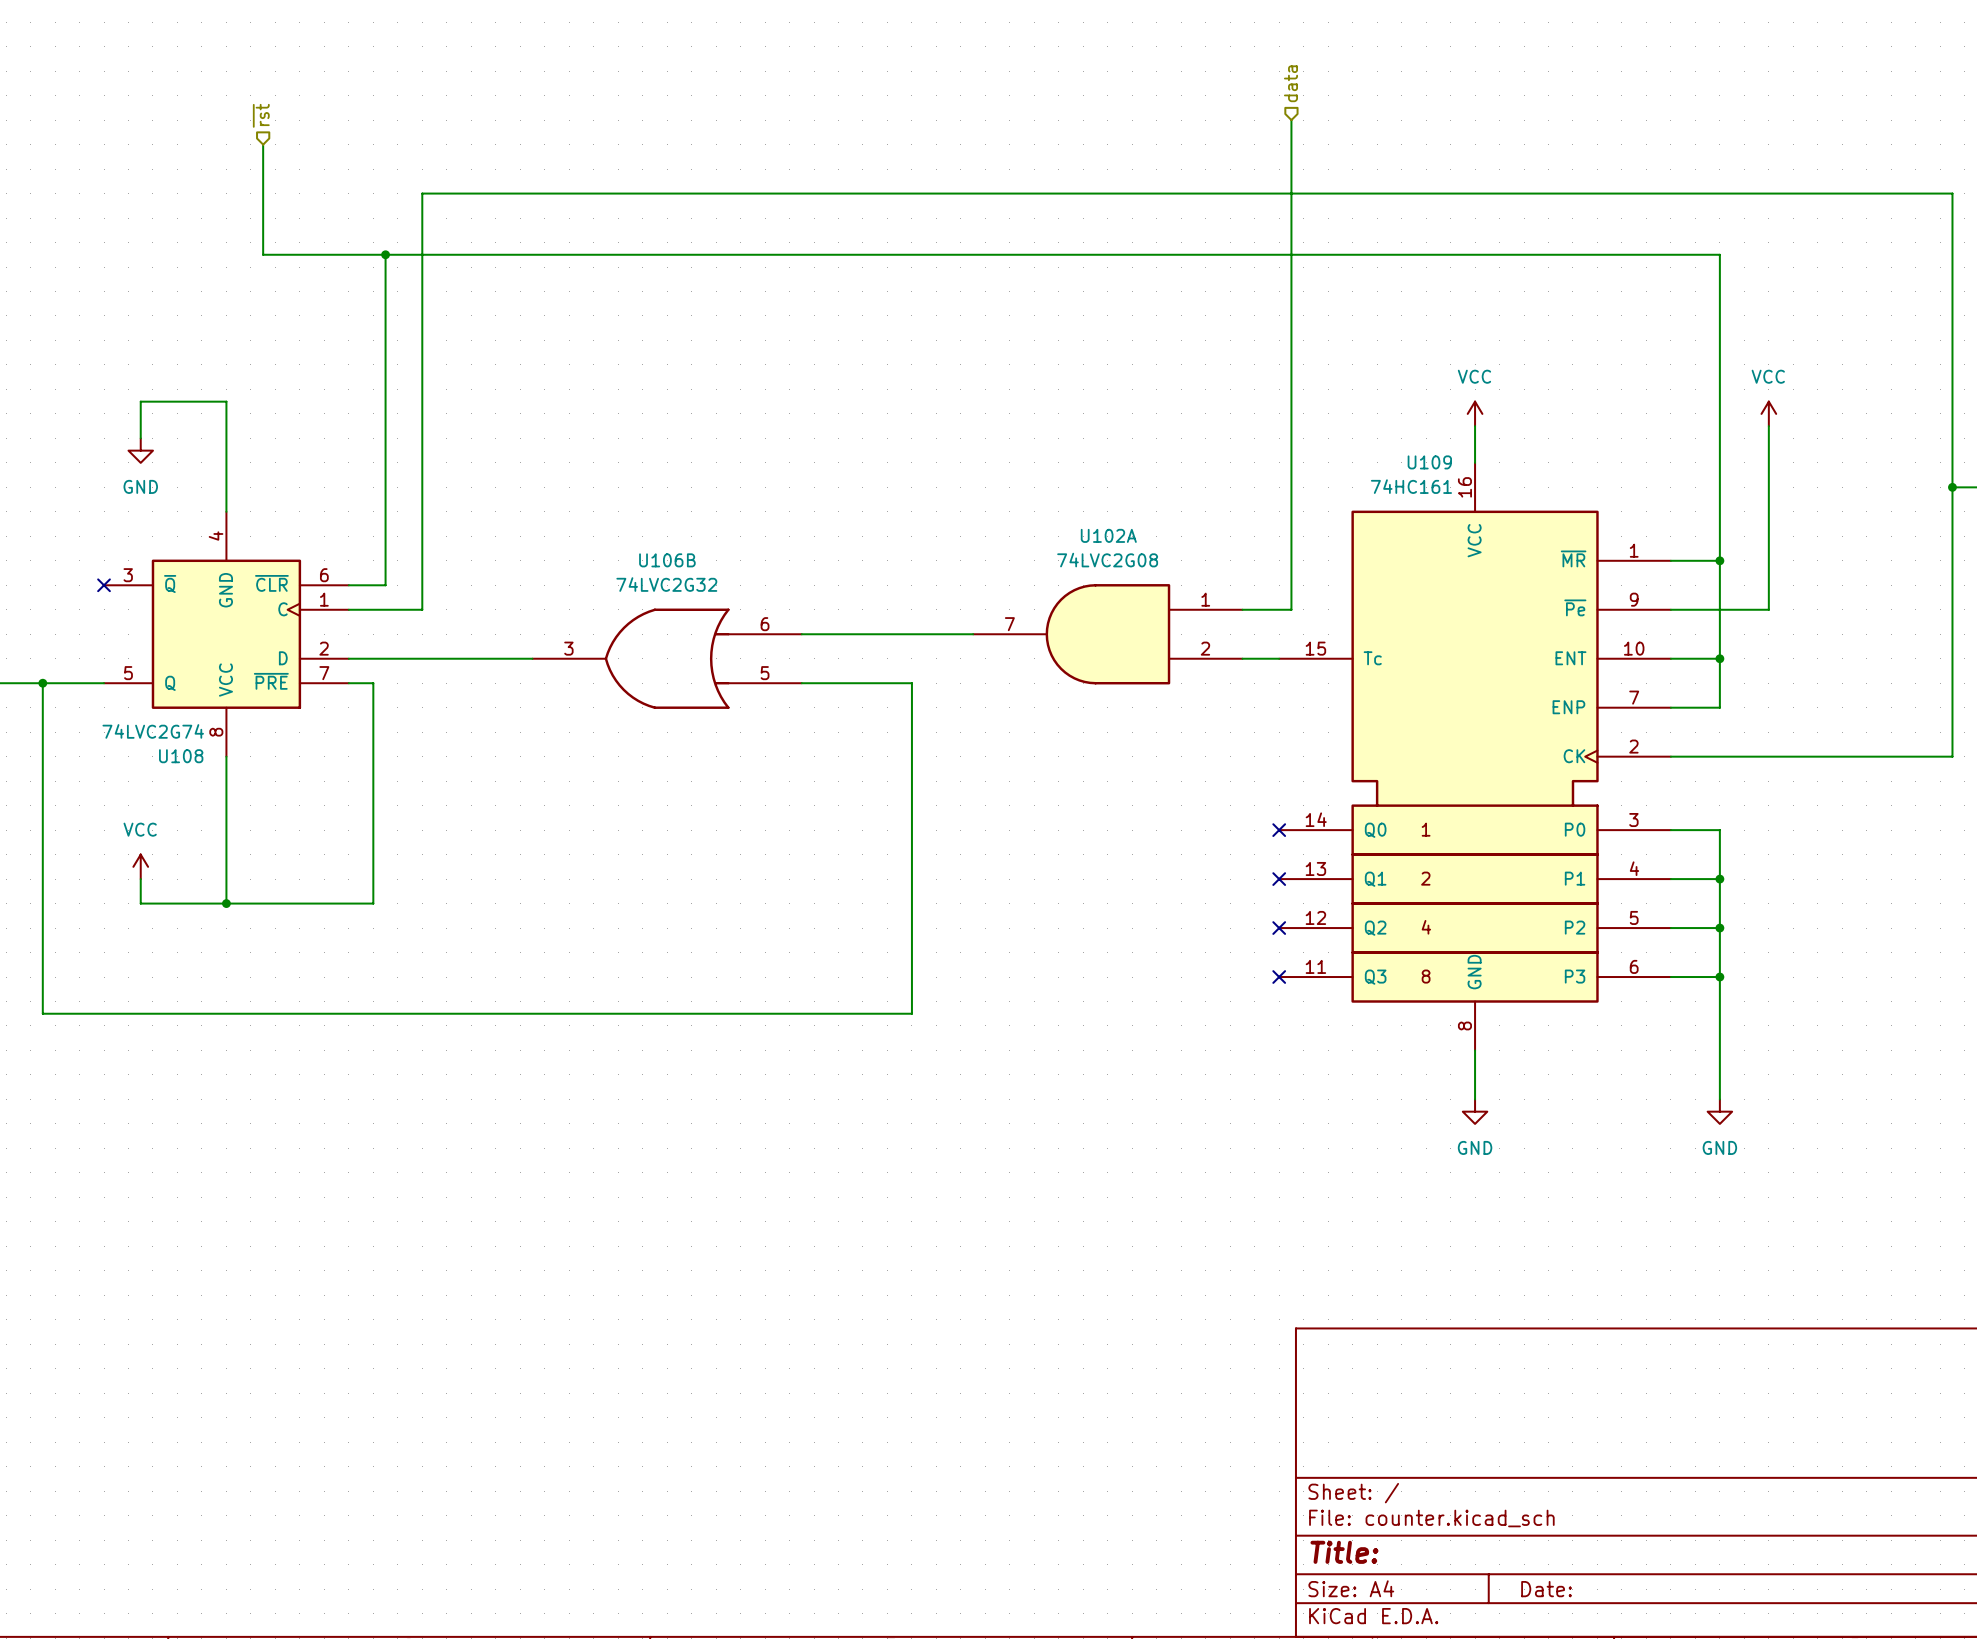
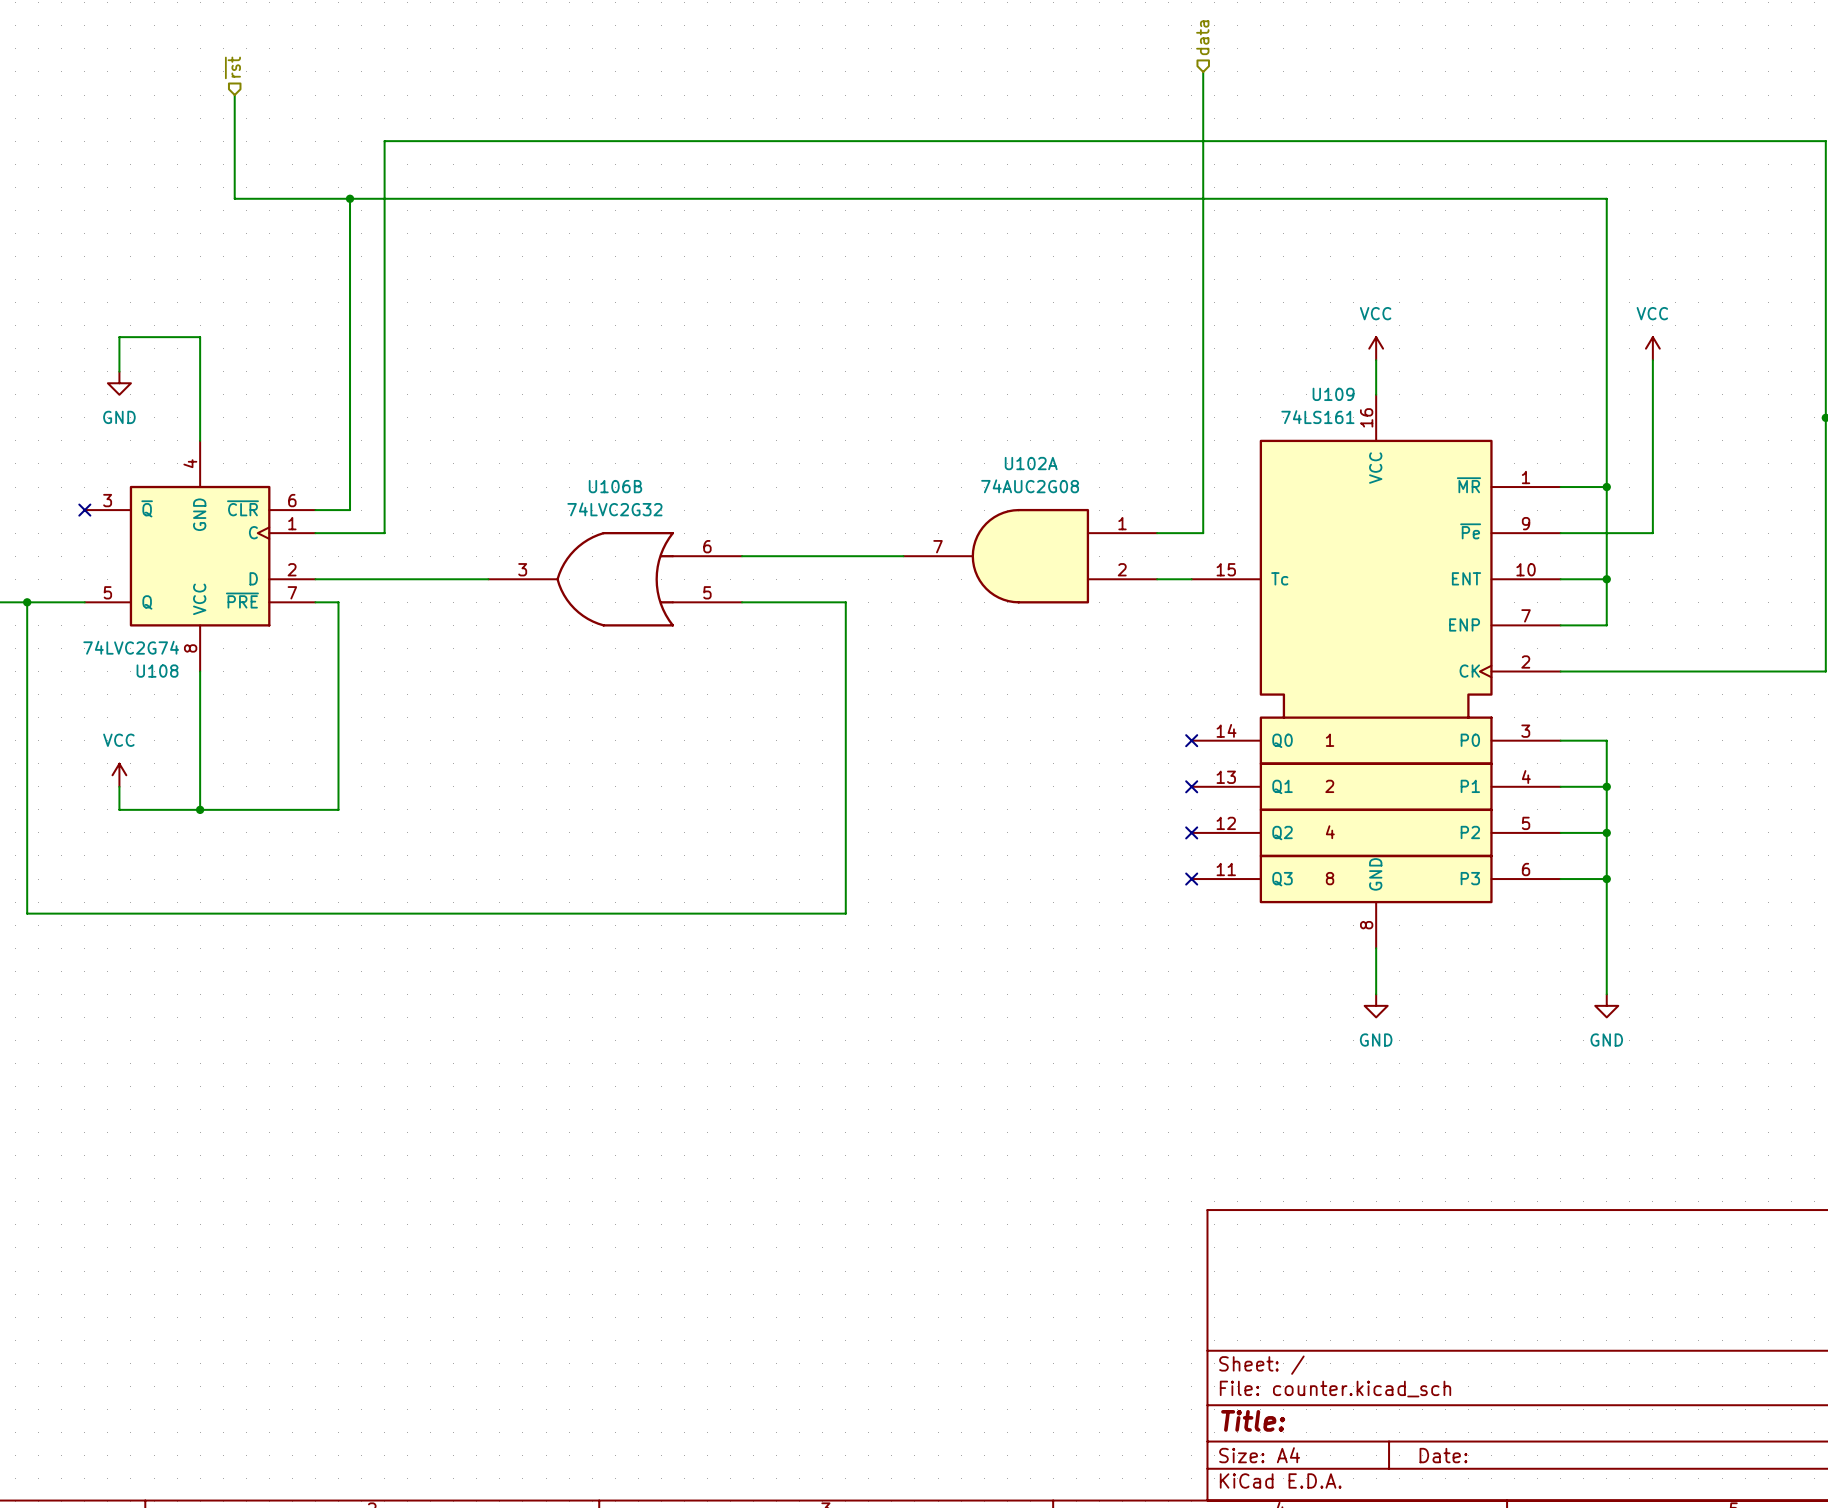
U109 value: 74HC161 (1411, 486) -> 74LS161 (1317, 417)
U102A value: 74LVC2G08 (1107, 560) -> 74AUC2G08 (1030, 486)

